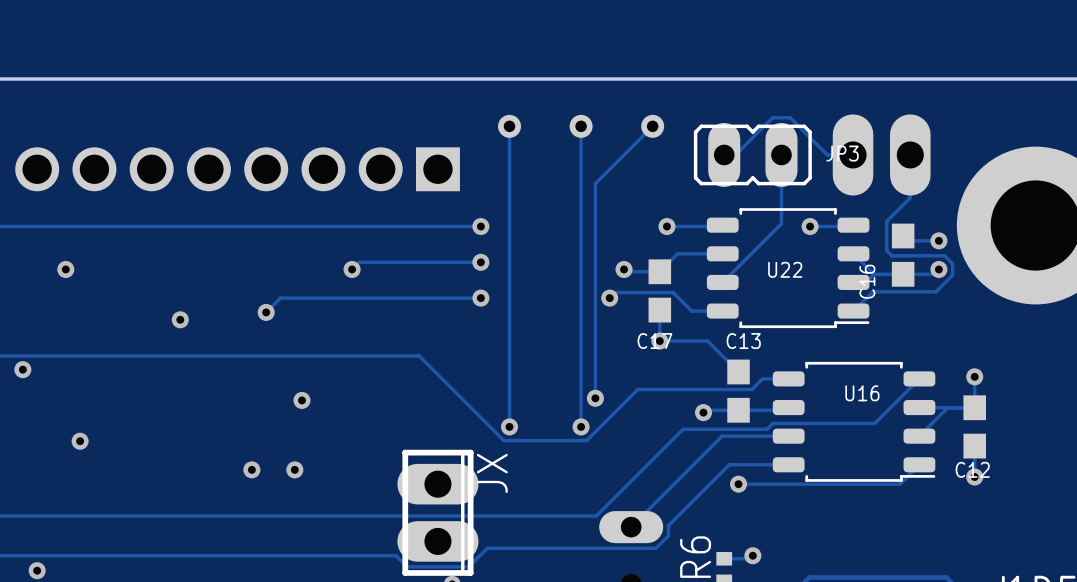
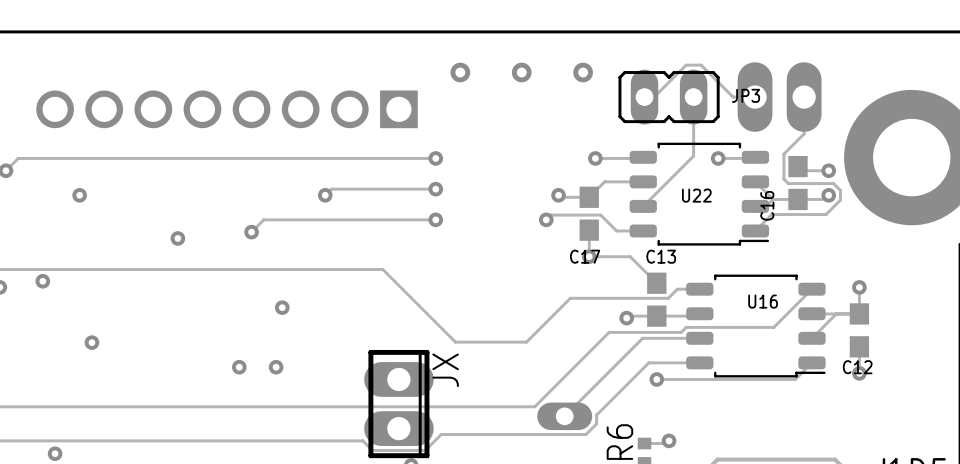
track: (509, 126) (509, 426) -> none
track: (581, 126) (581, 426) -> none
track: (652, 126) (595, 183) (595, 398) -> none
via: (595, 398) -> none
via: (509, 426) -> none
via: (581, 426) -> none

